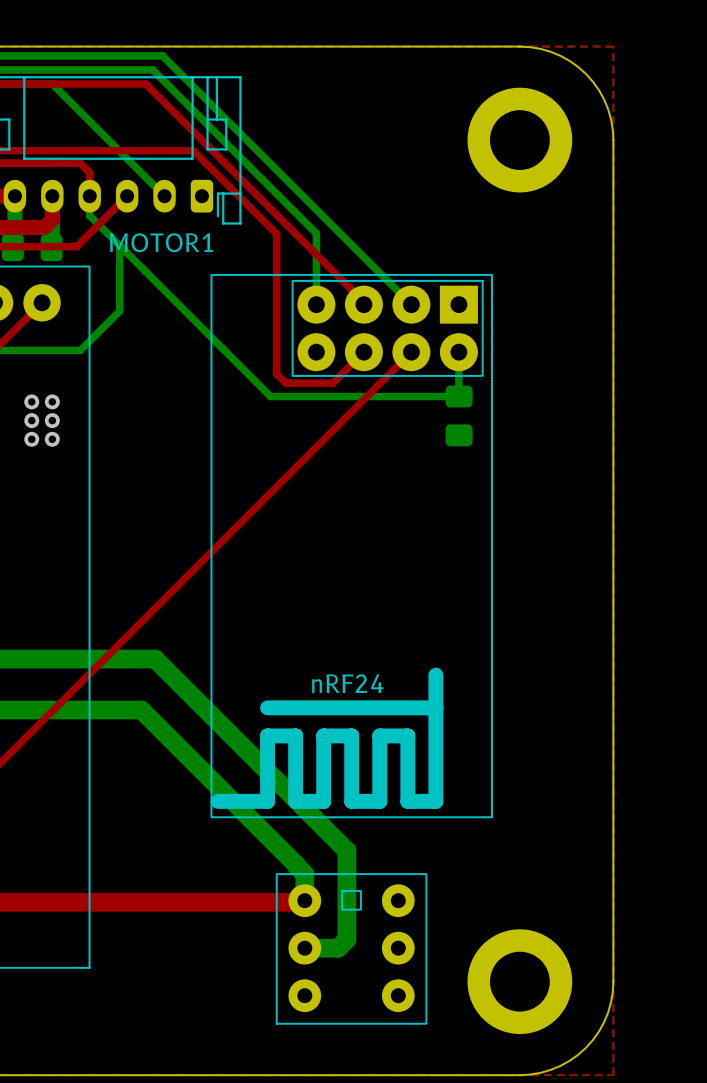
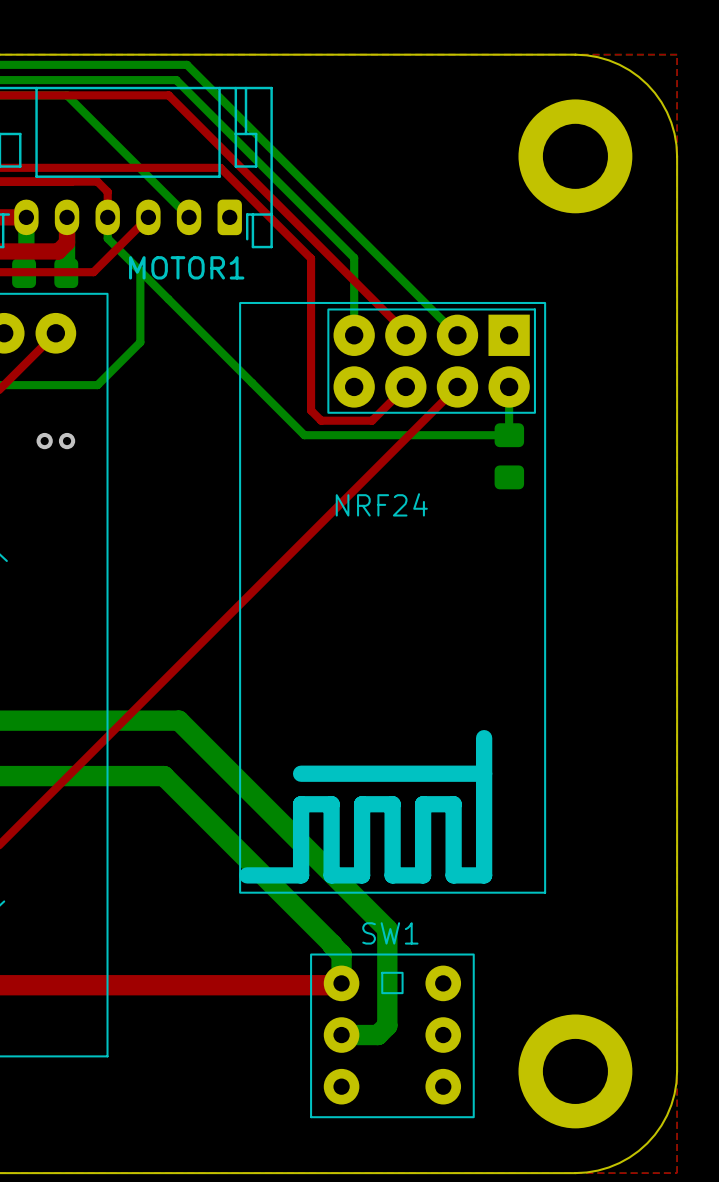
via: (31, 420) -> none
via: (52, 420) -> none
via: (31, 439) -> none
via: (52, 439) -> none
NRF24 name: none -> NRF24 (381, 504)
NRF24 text: nRF24 (347, 683) -> none
SW1 name: none -> SW1 (390, 933)

